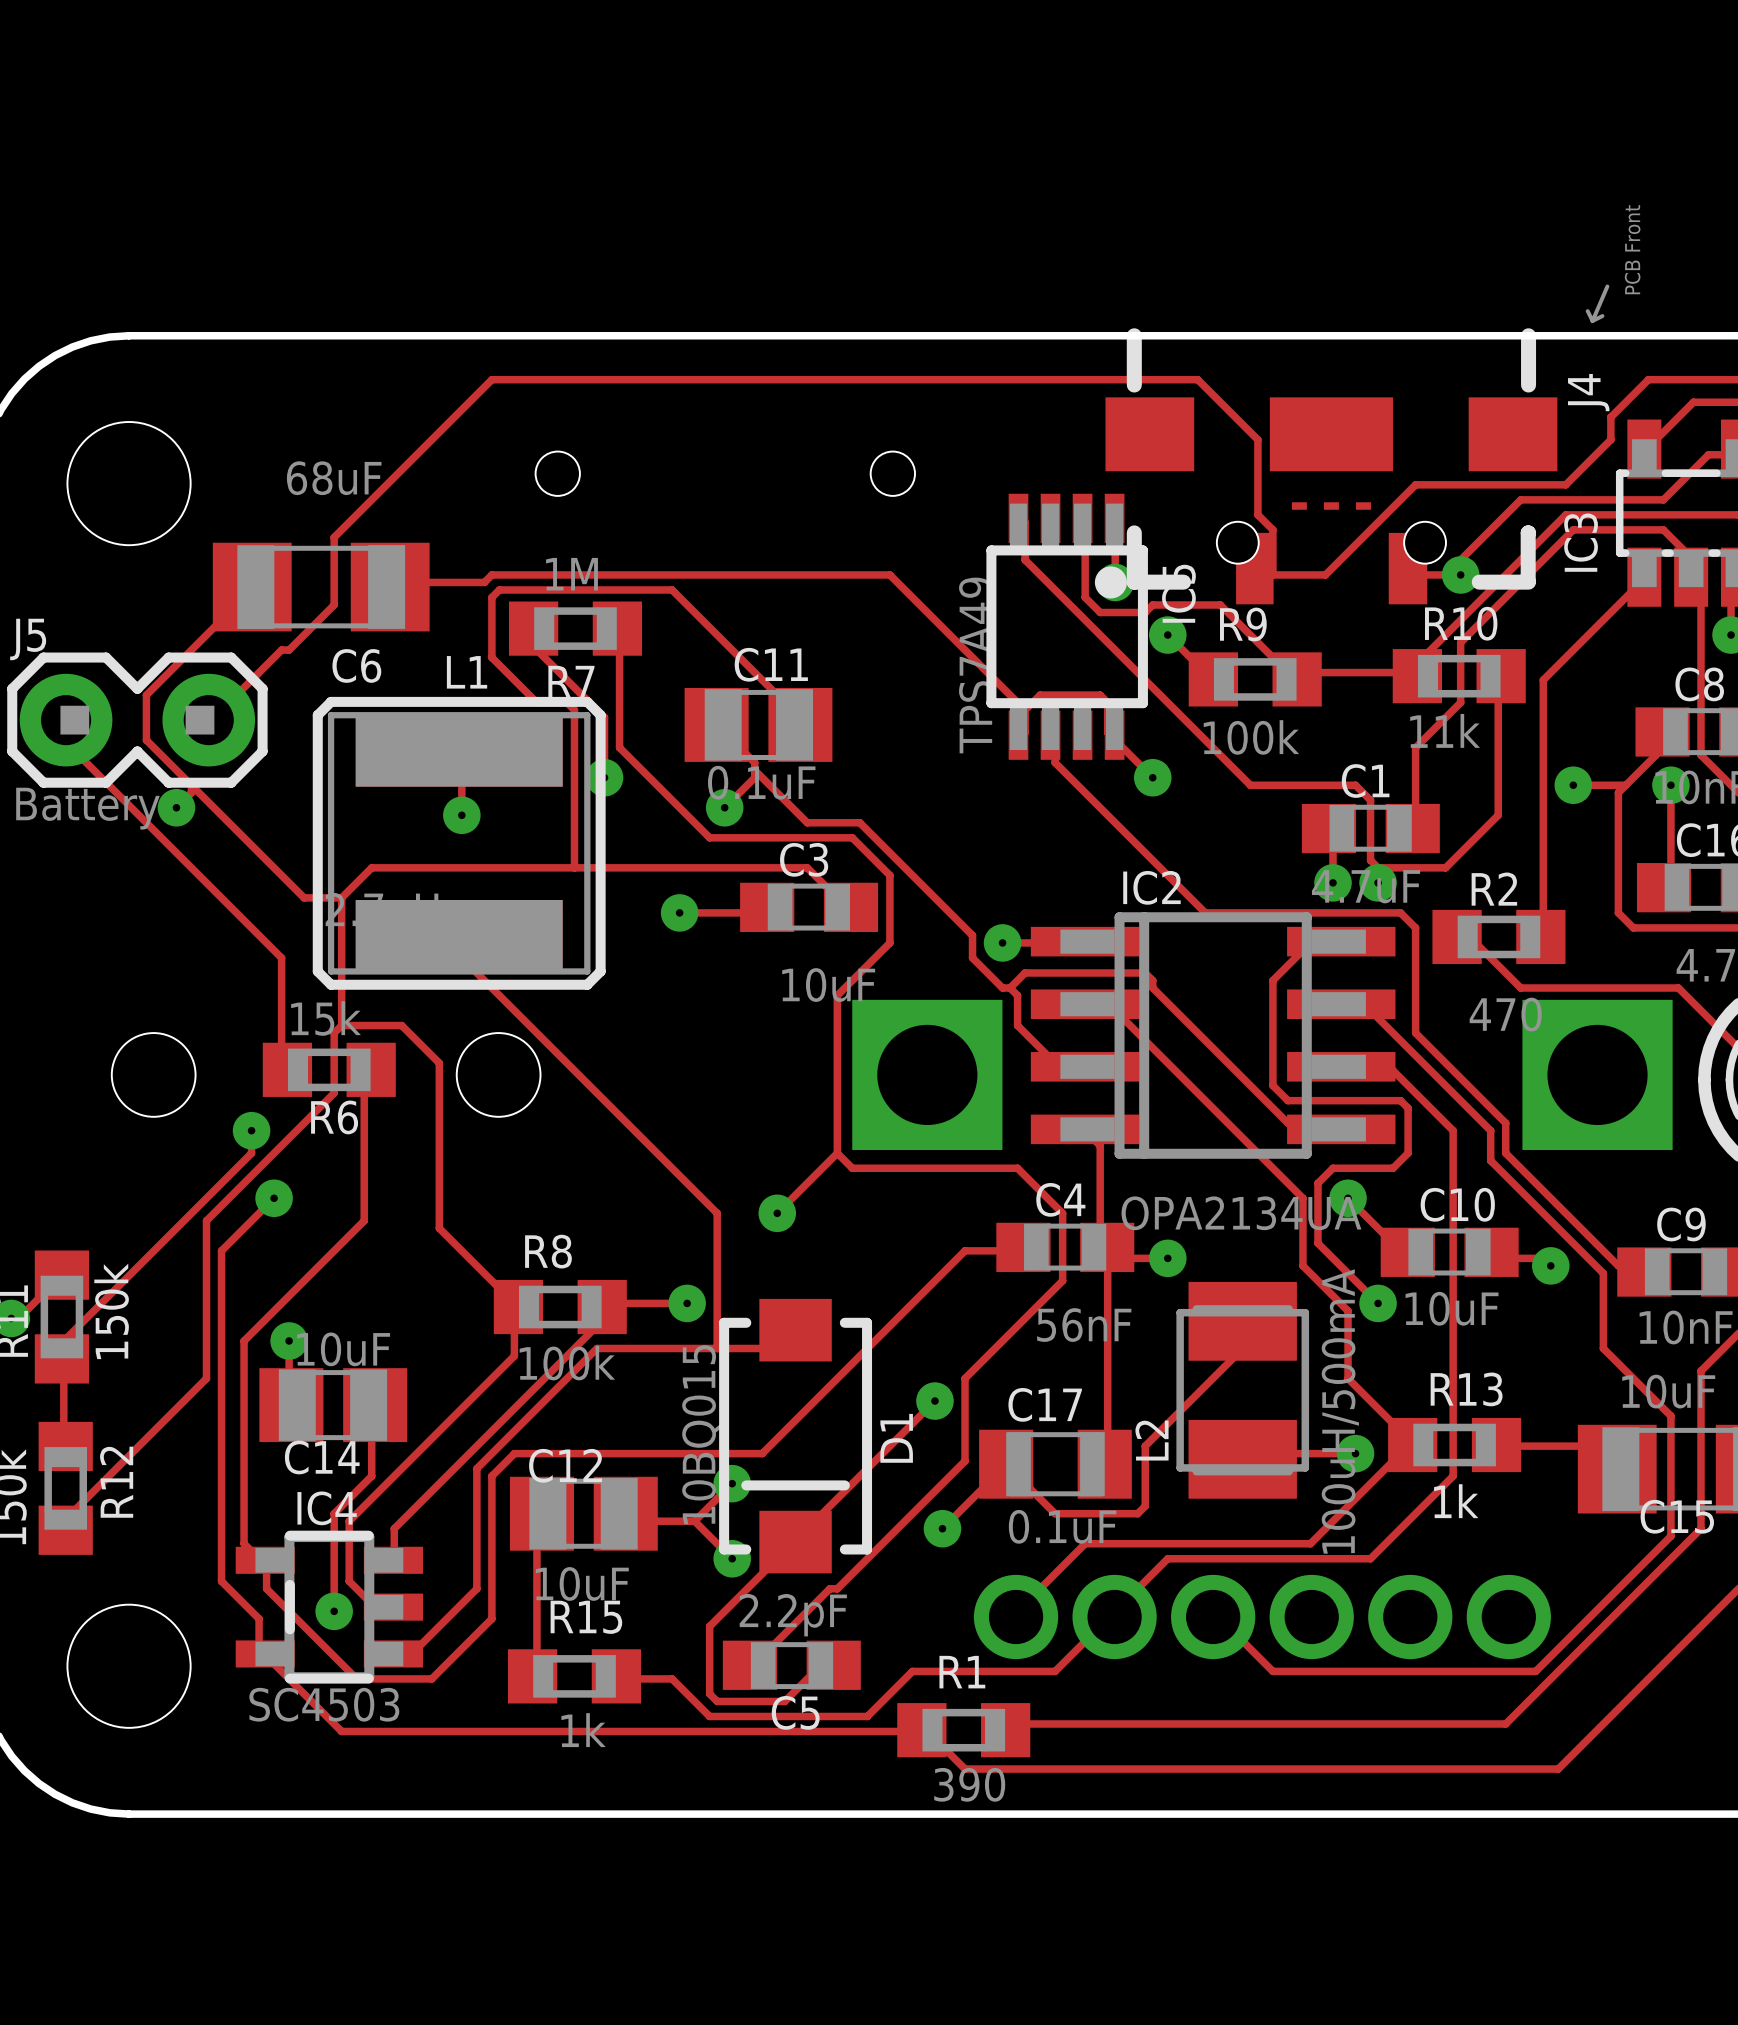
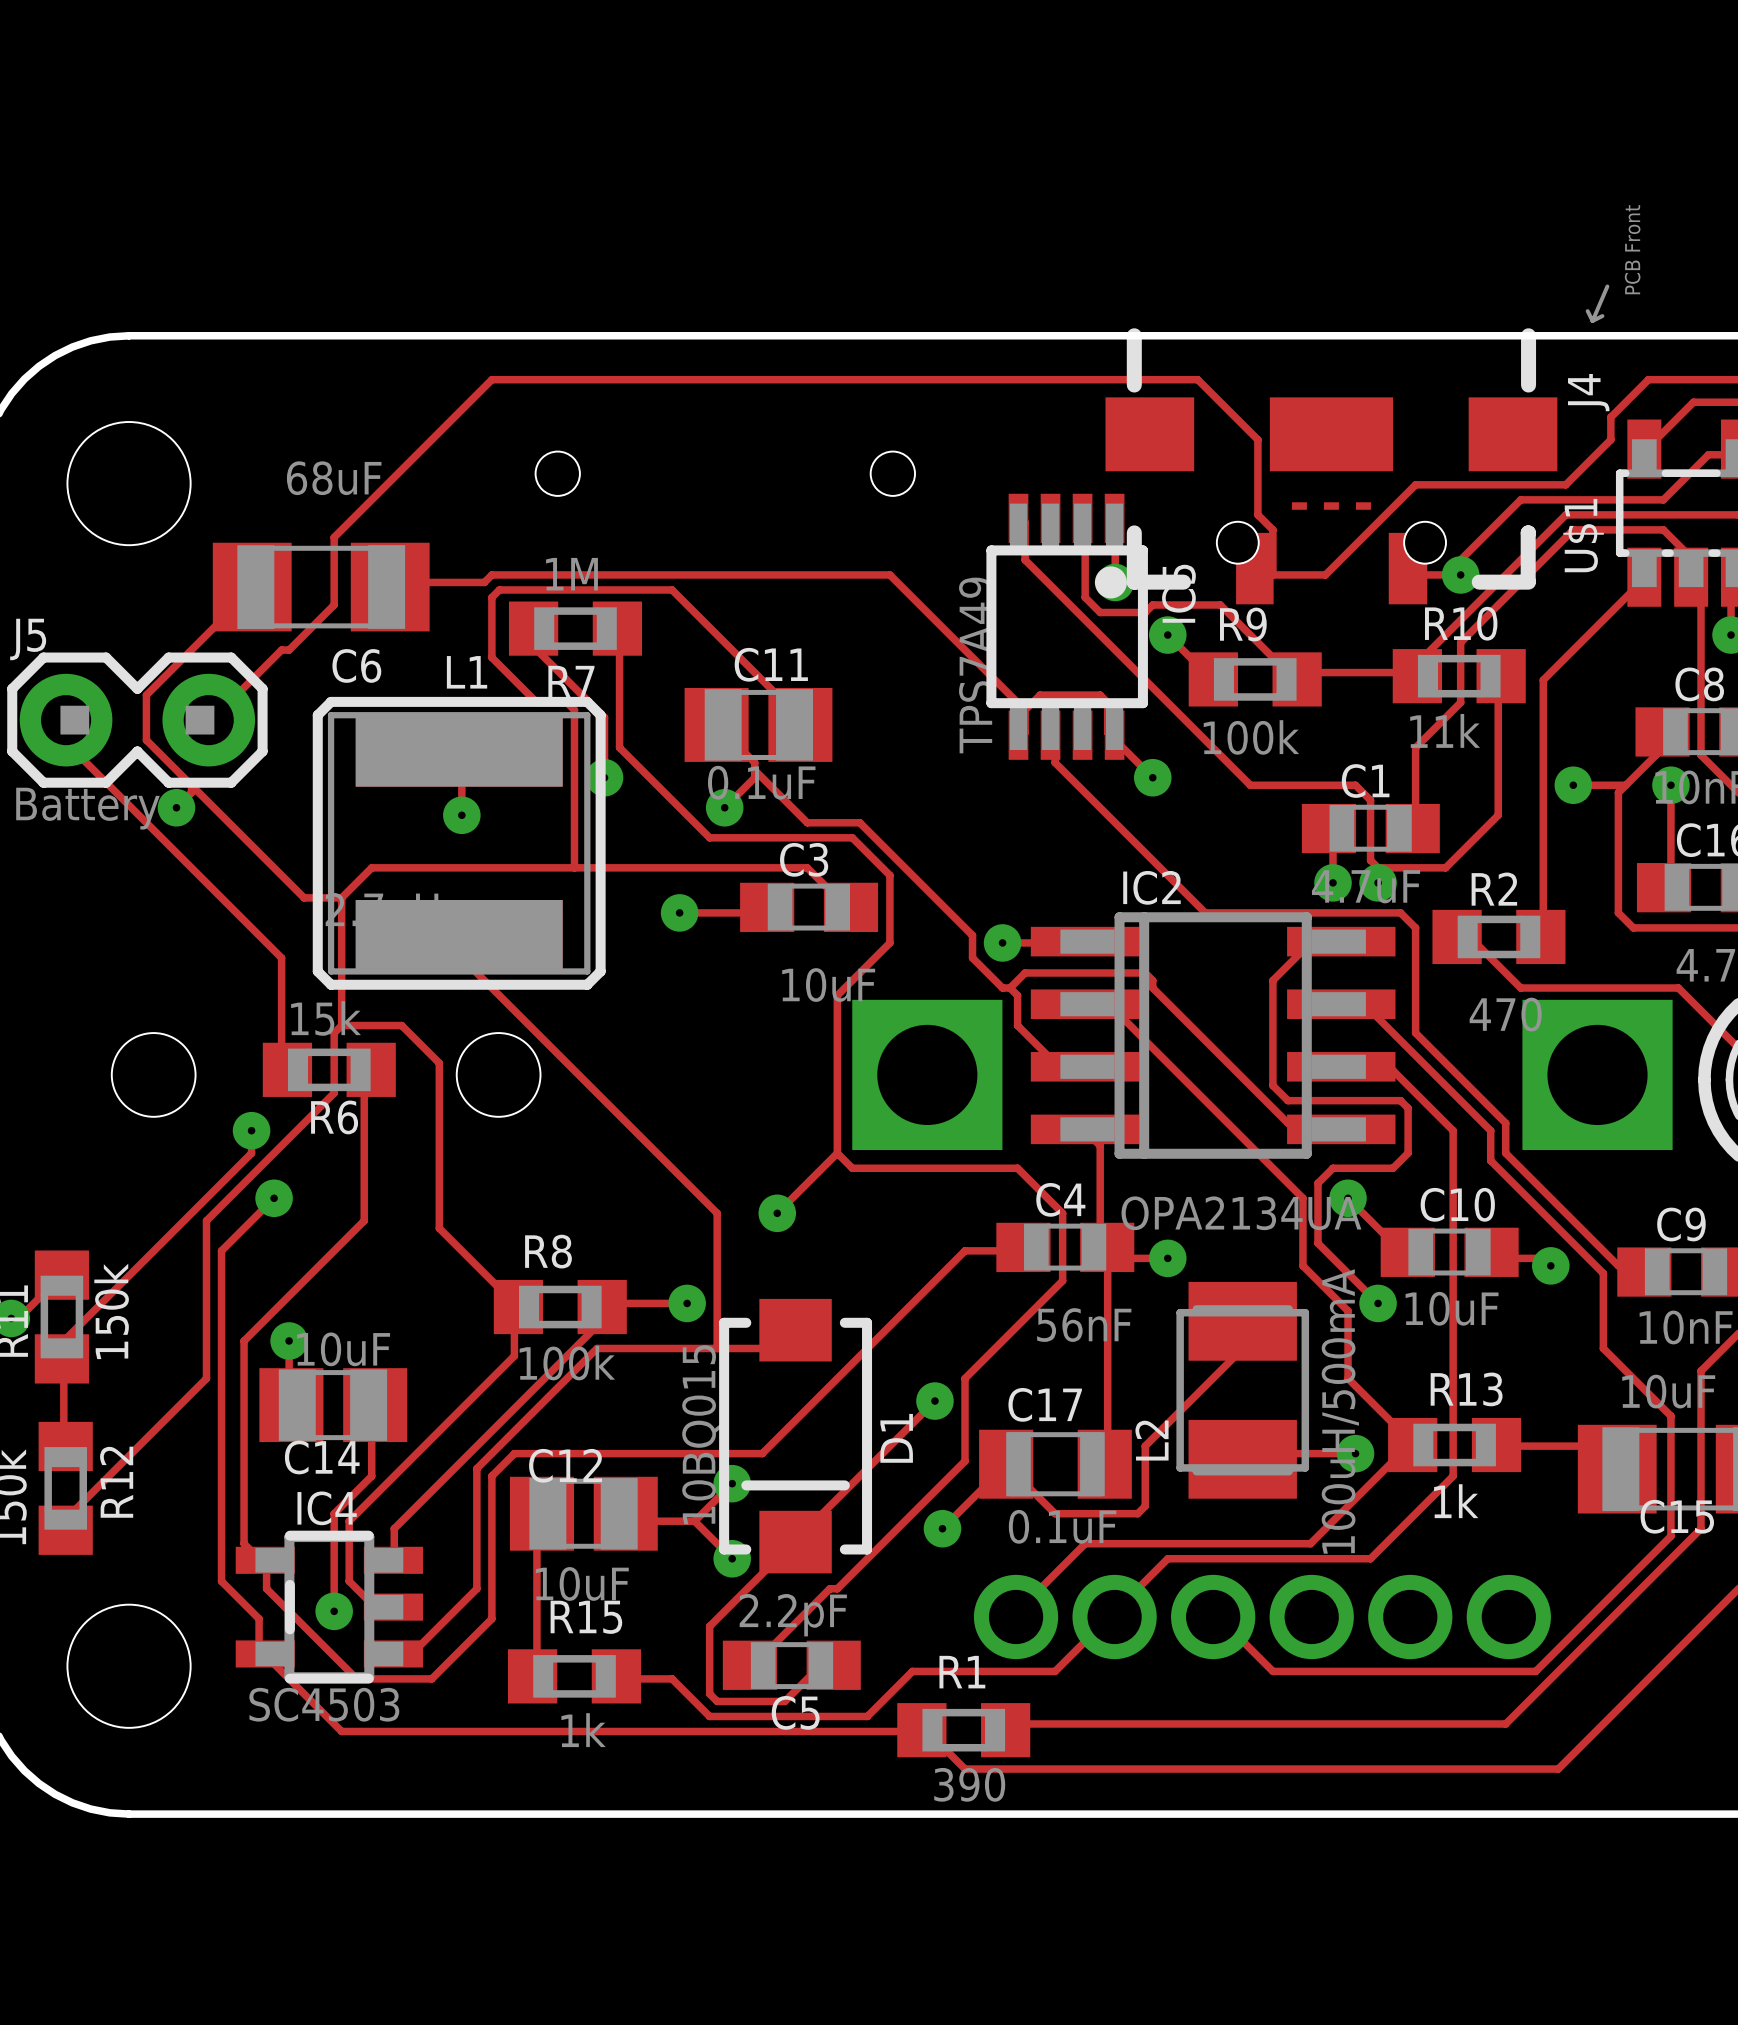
IC3 name: IC3 (1581, 542) -> U$1 (1583, 535)

